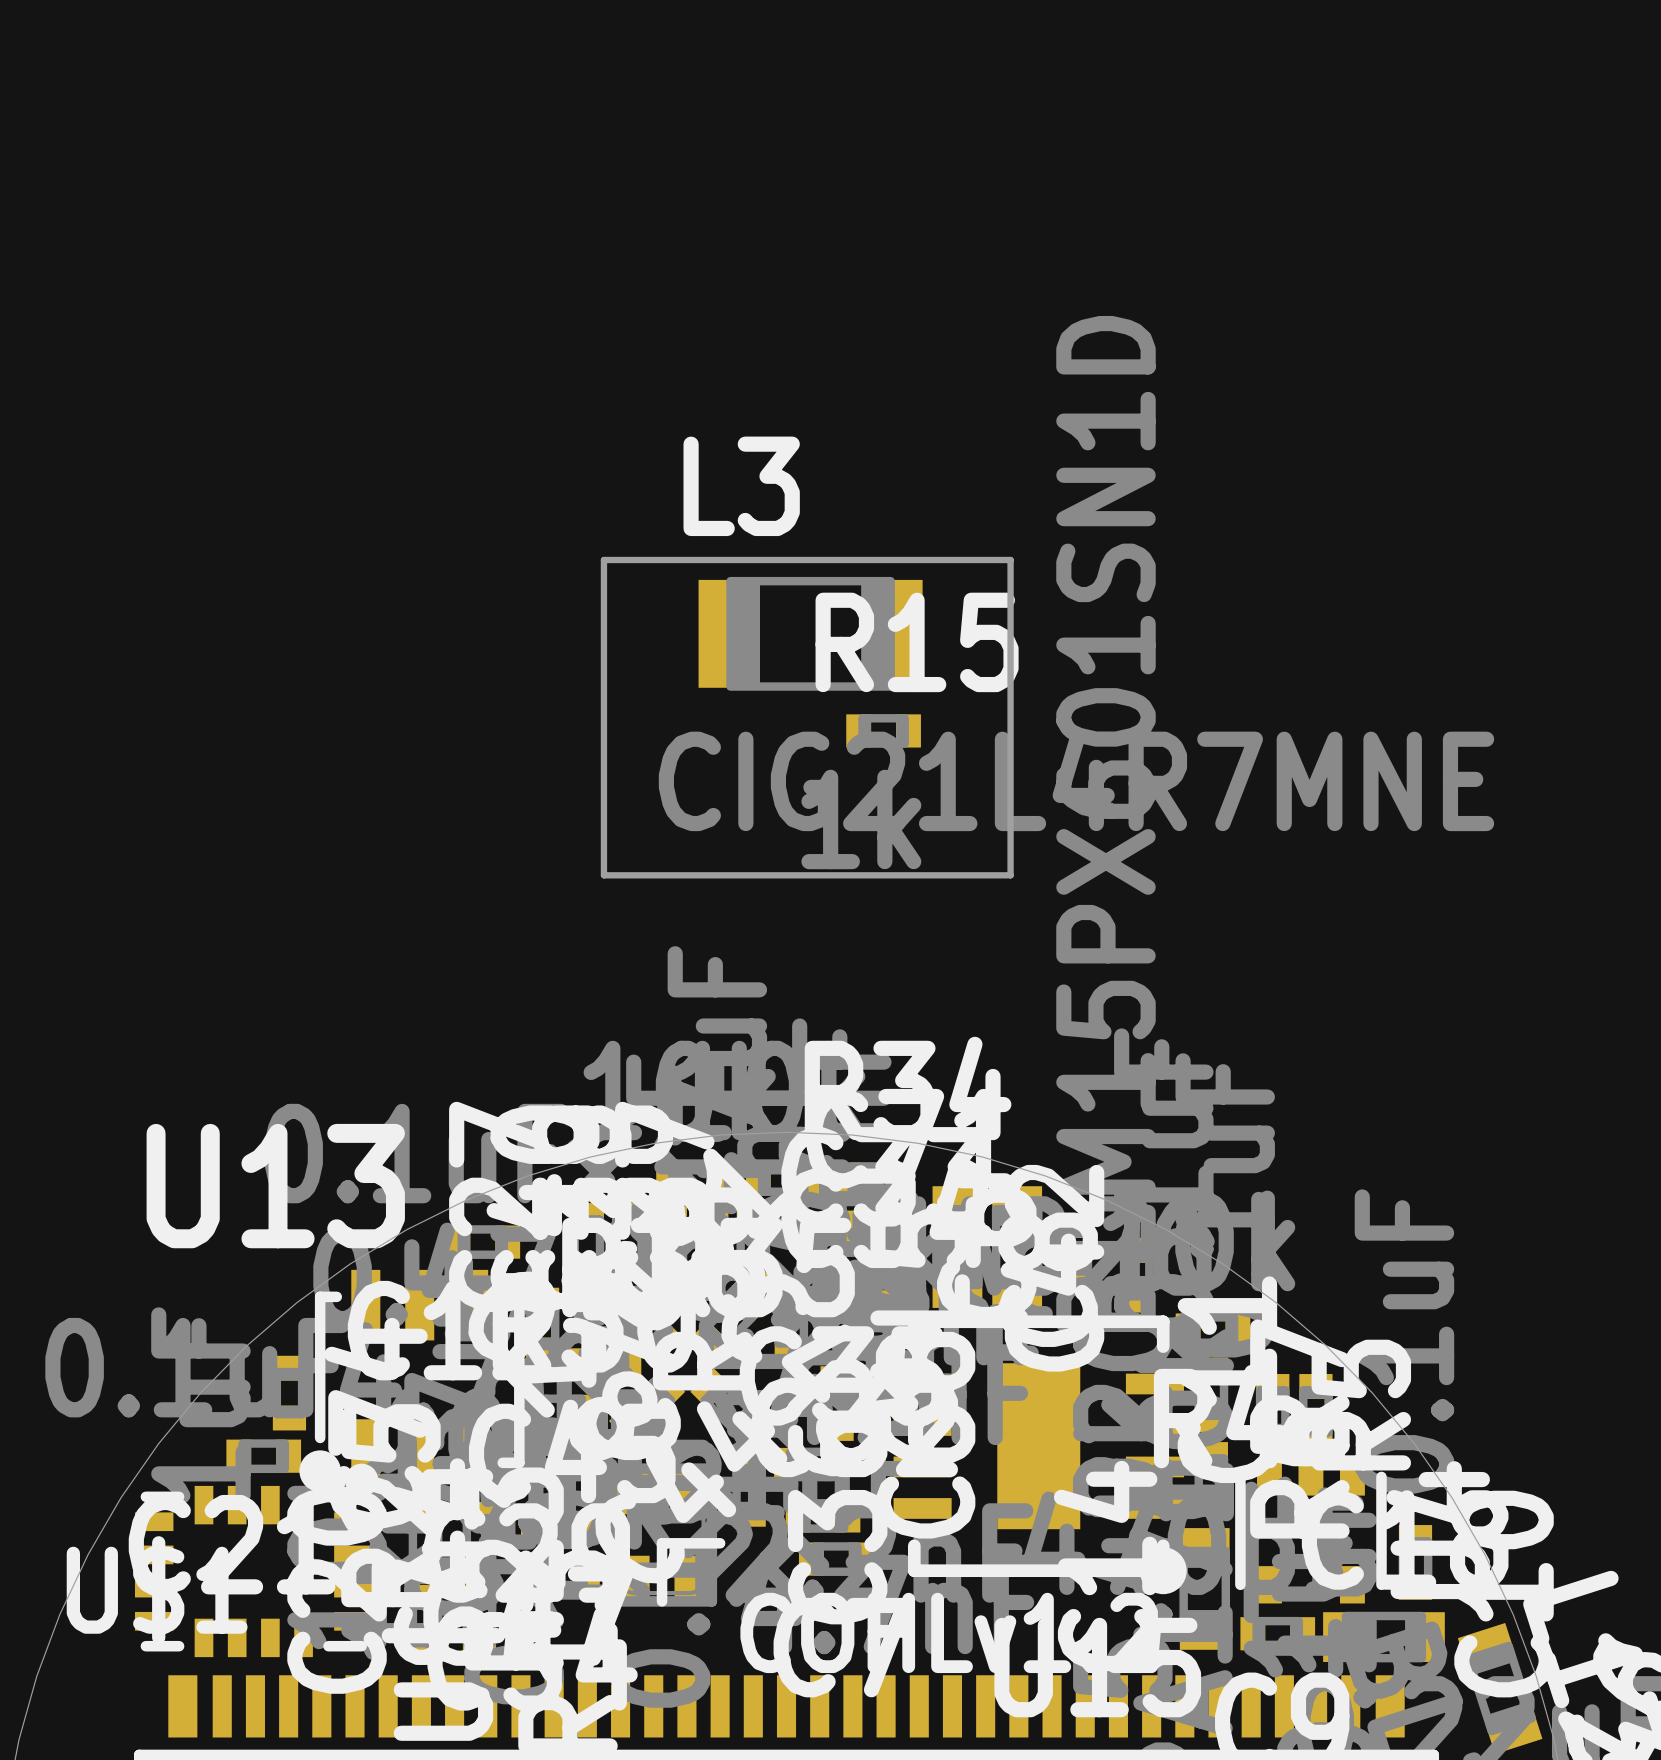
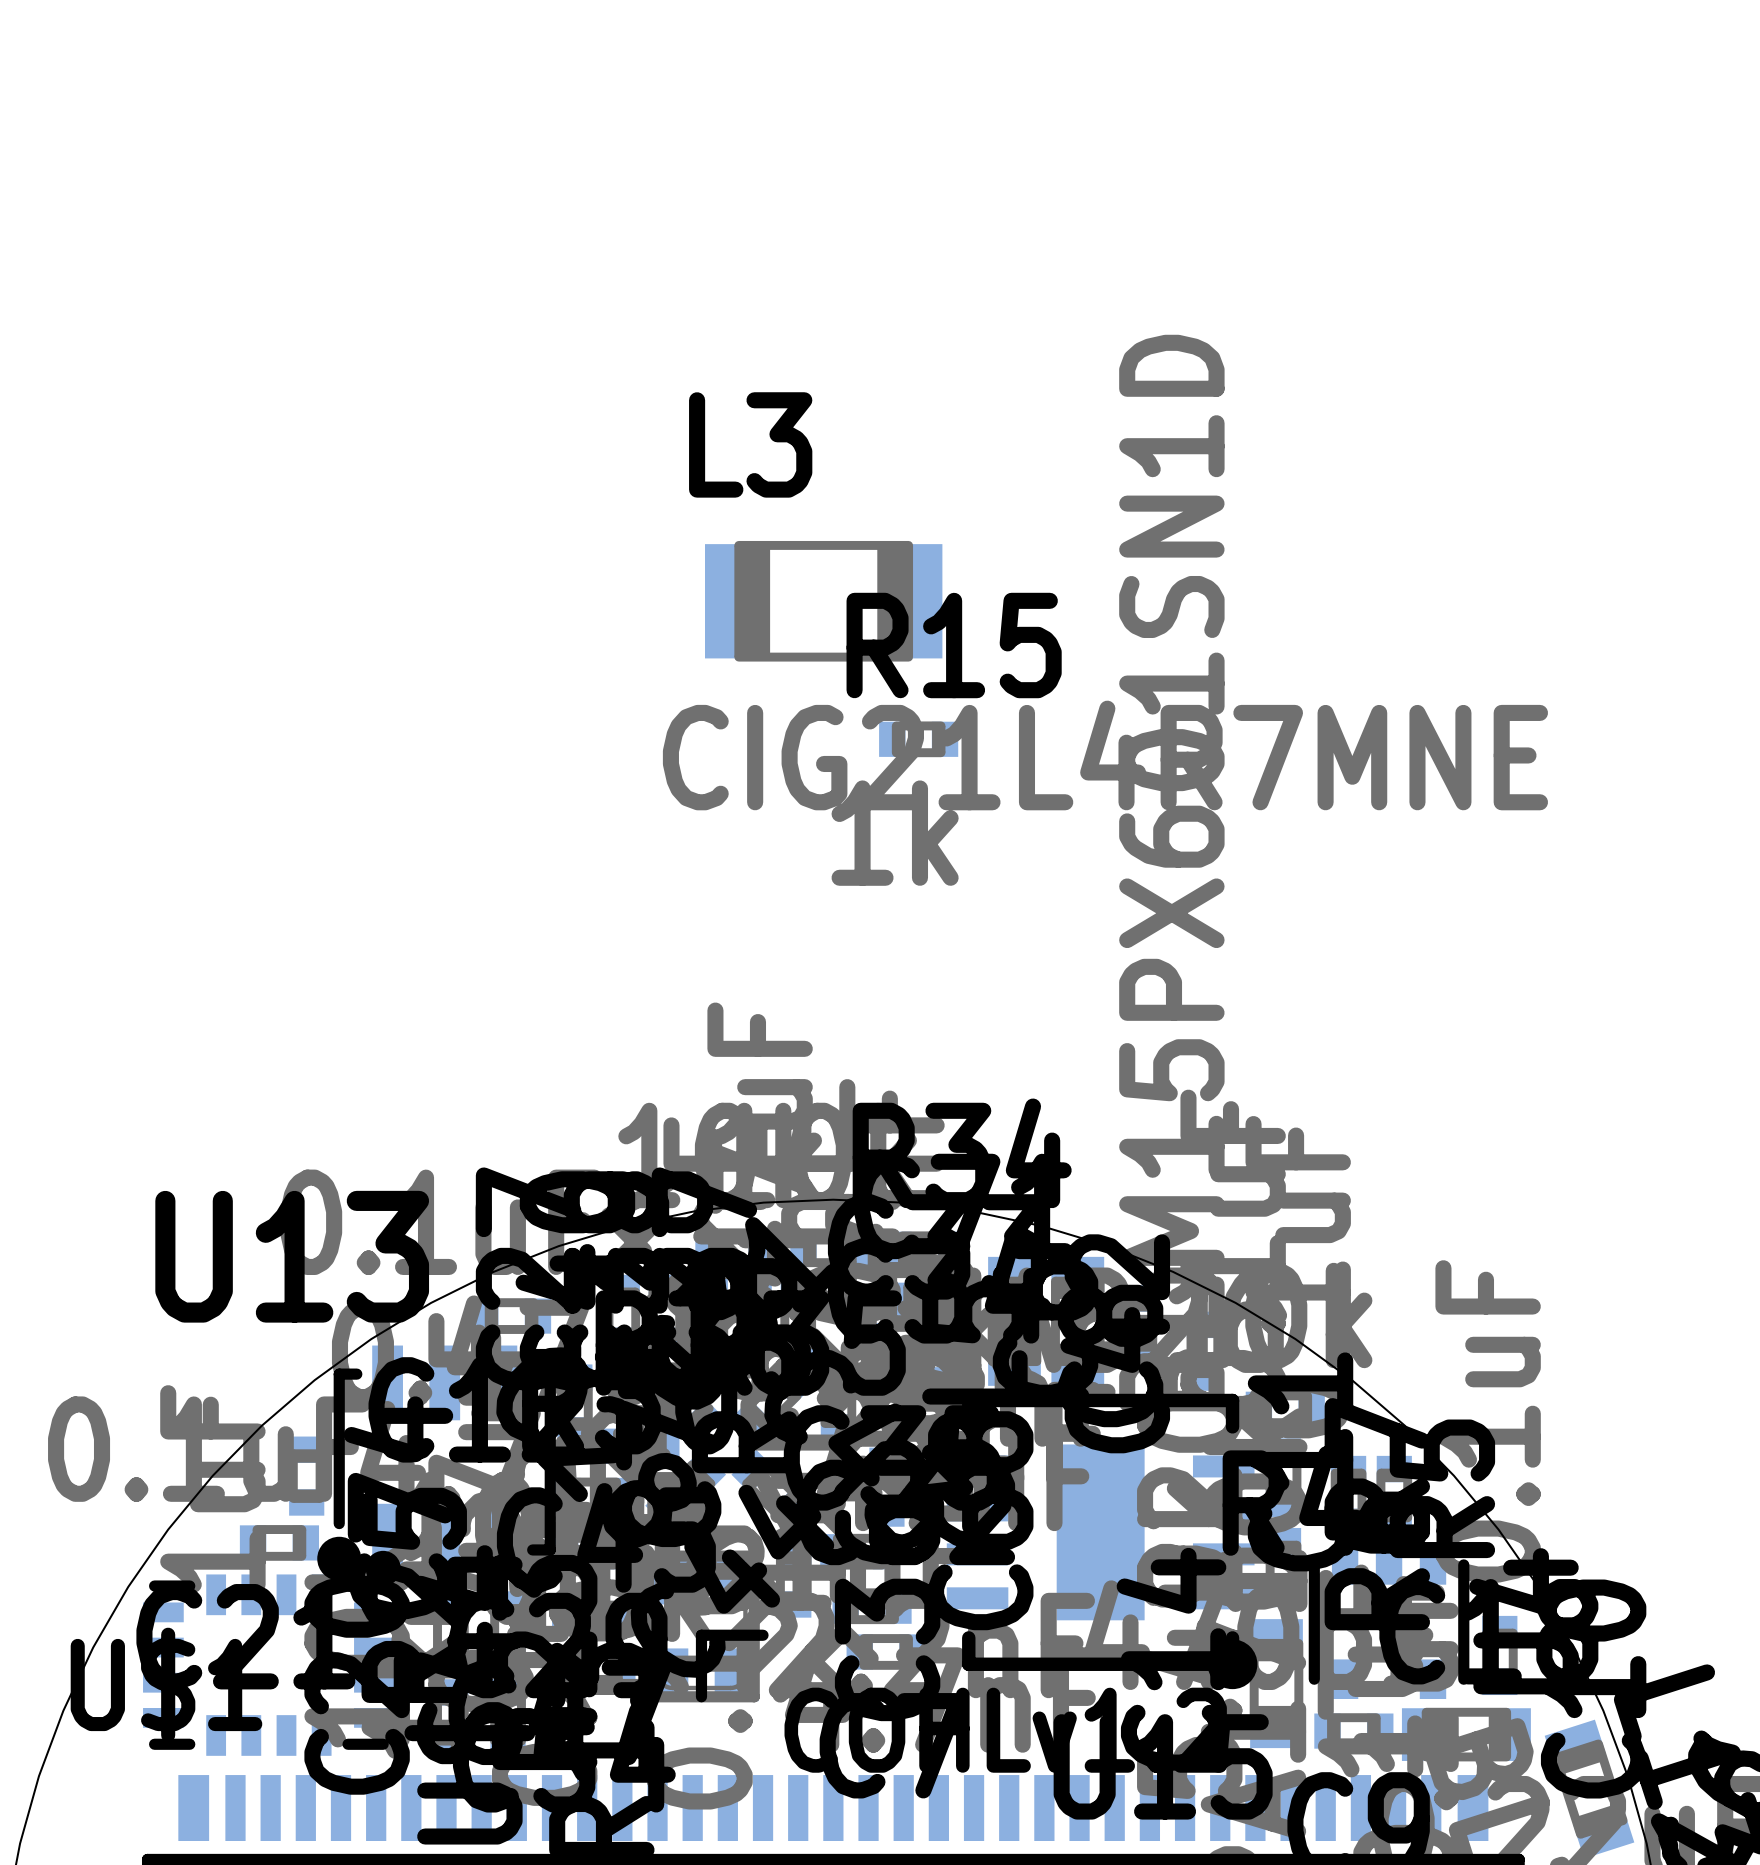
board edge: (1010, 559) (603, 559) (603, 875) (1010, 875) (1010, 559) -> none
L3 position: (810, 633) -> (823, 601)
R15 position: (883, 730) -> (918, 739)

